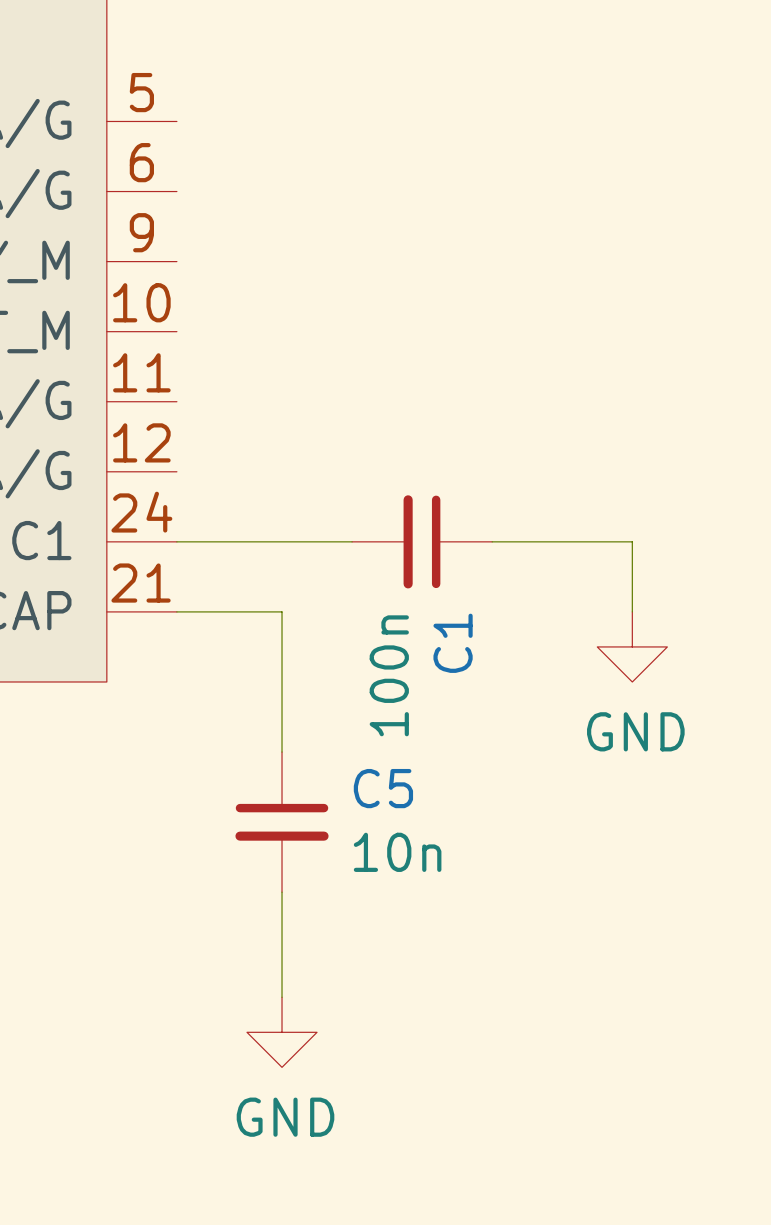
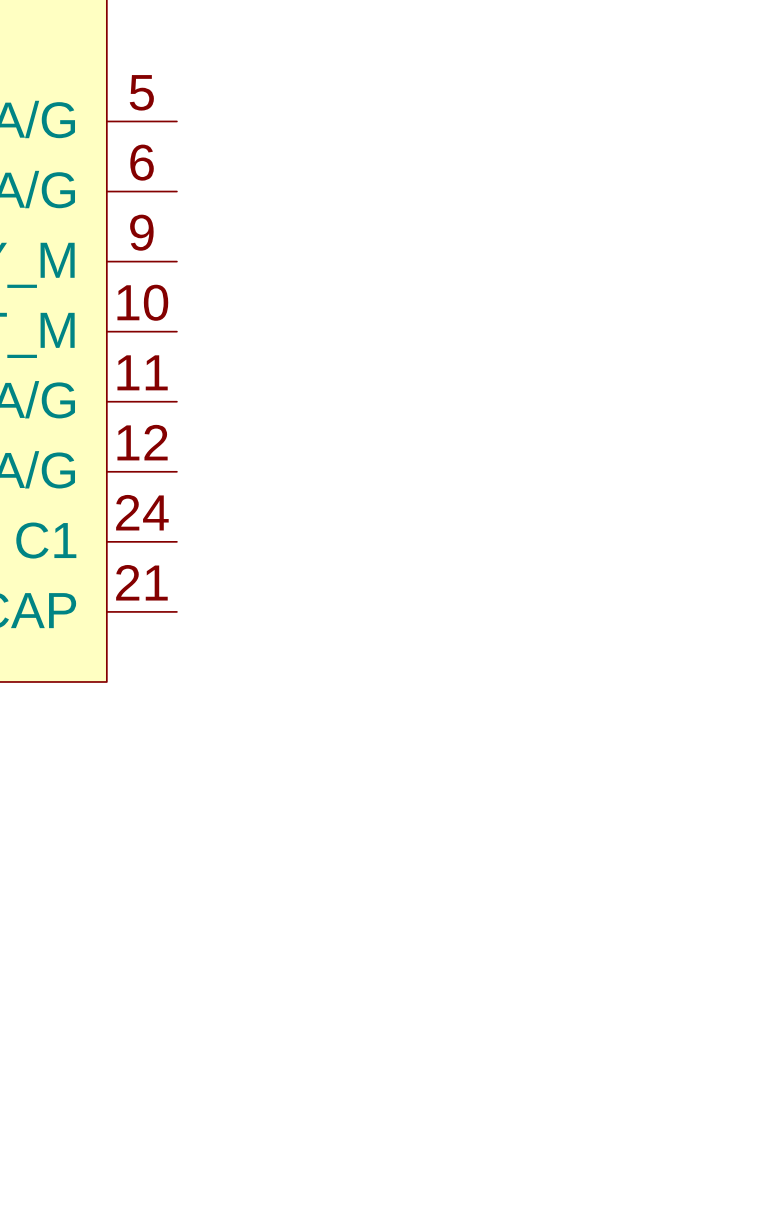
wire: (176, 541) (352, 541) -> none
C1: 100n (422, 541) -> none
wire: (492, 541) (632, 541) (632, 611) -> none
wire: (176, 611) (282, 611) (282, 752) -> none
power symbol: GND (632, 646) -> none
C5: 10n (282, 822) -> none
wire: (282, 892) (282, 997) -> none
power symbol: GND (282, 1032) -> none

